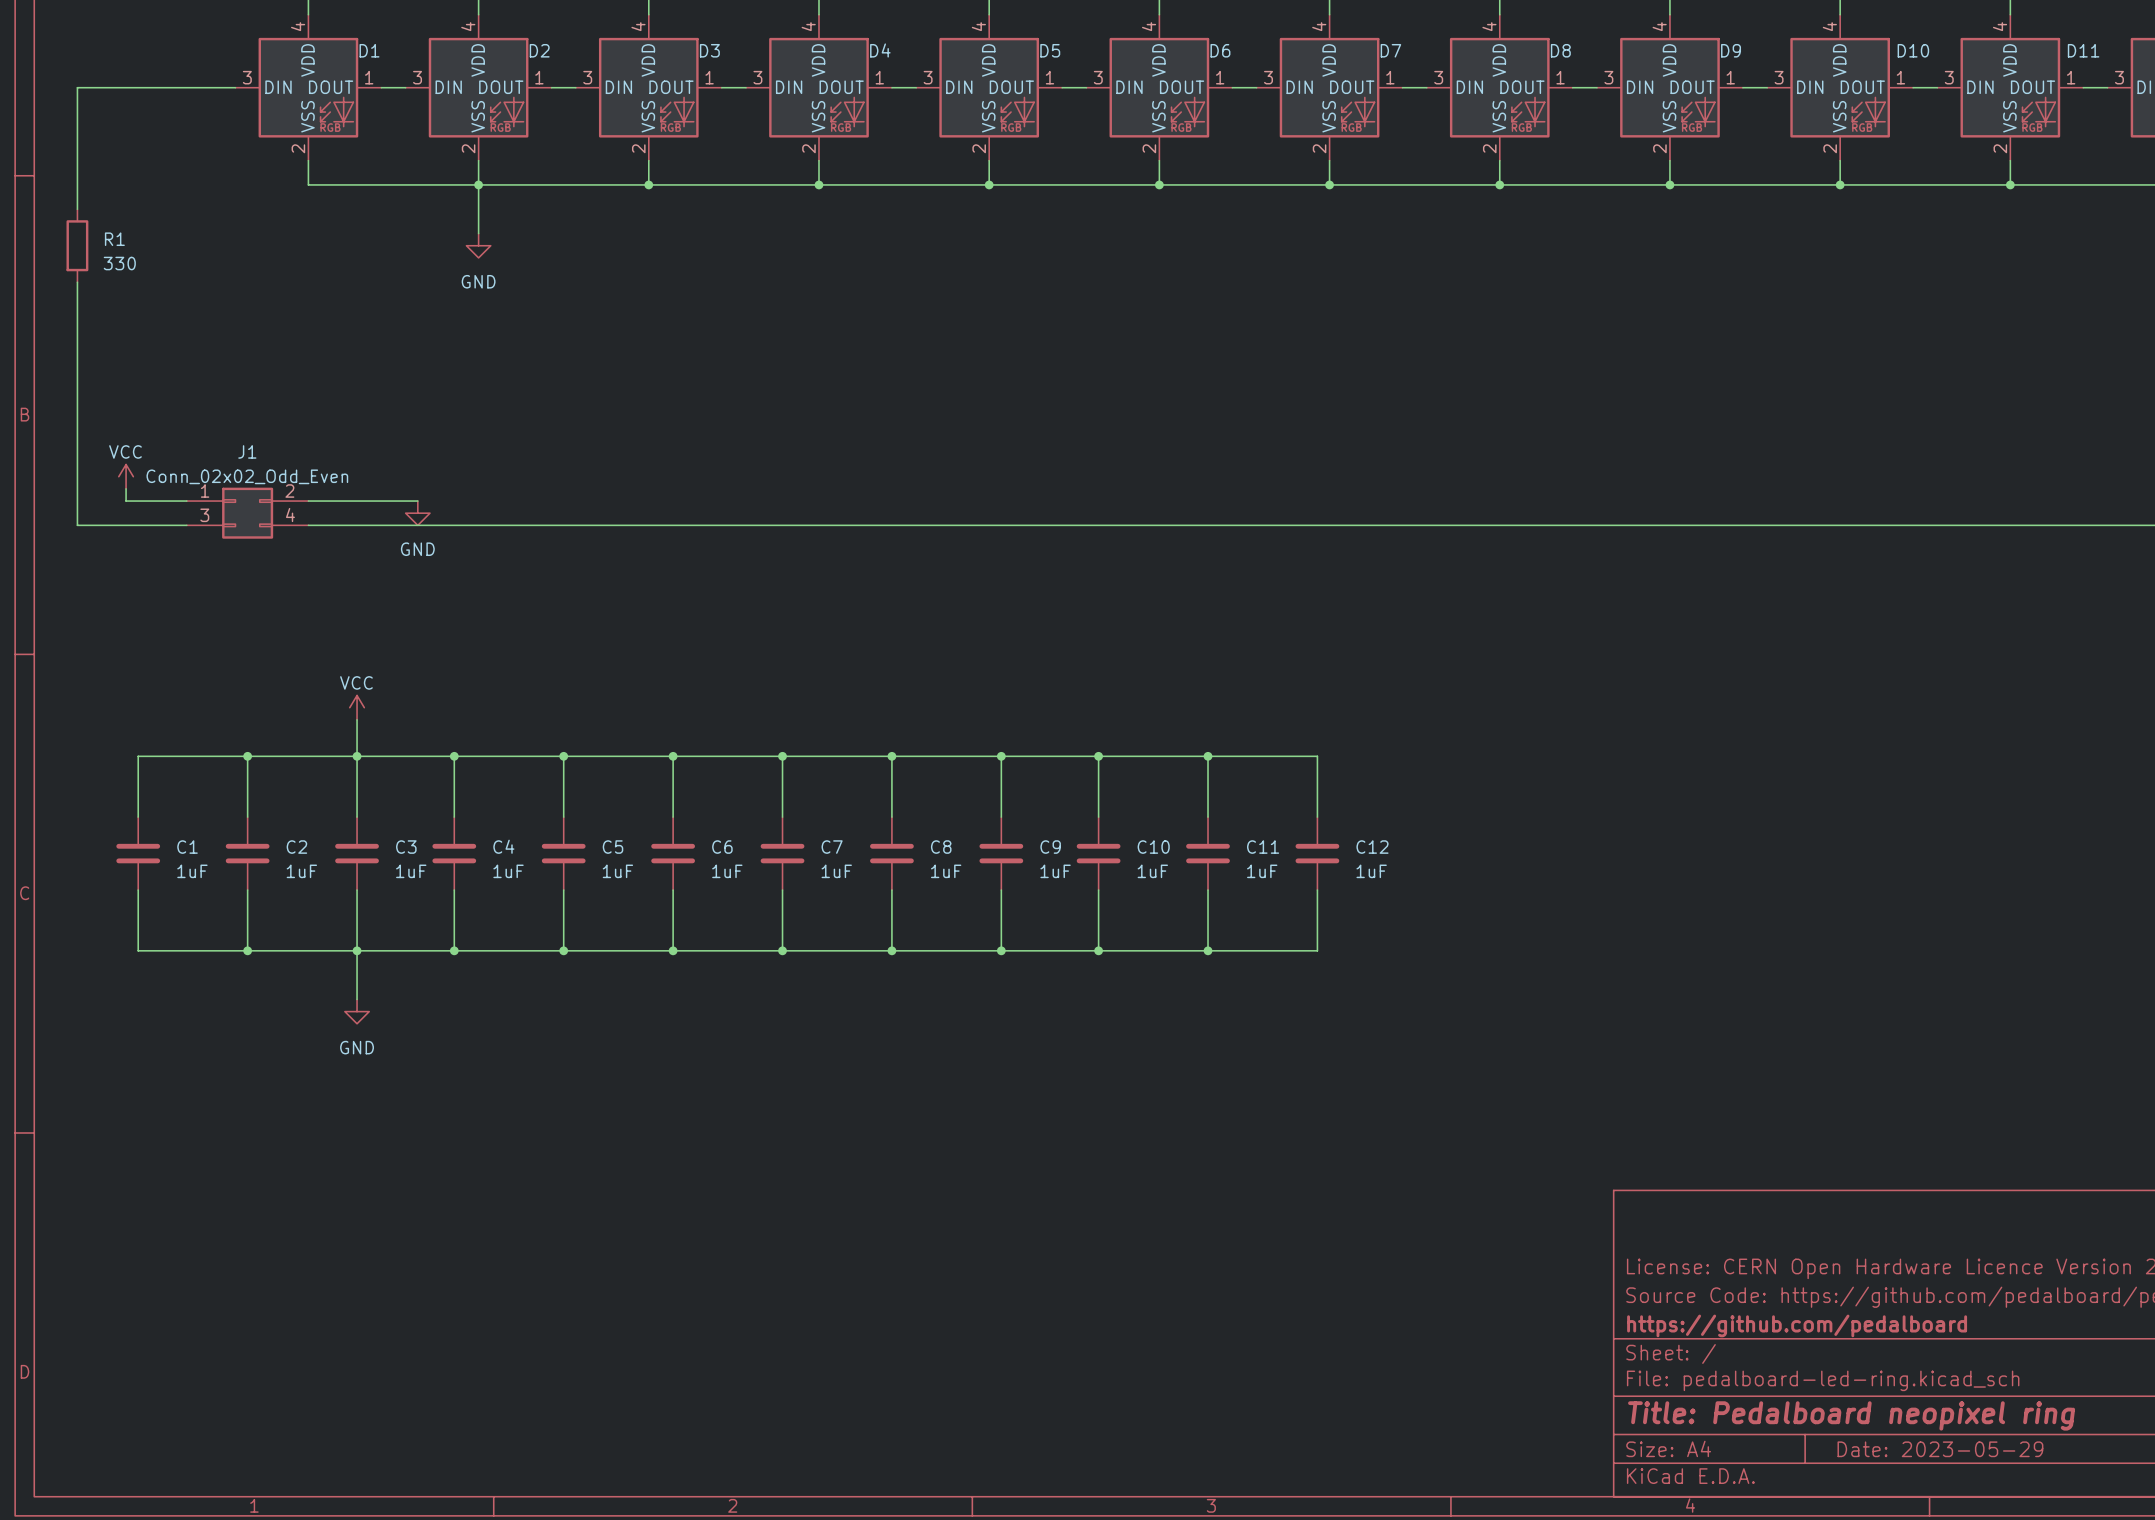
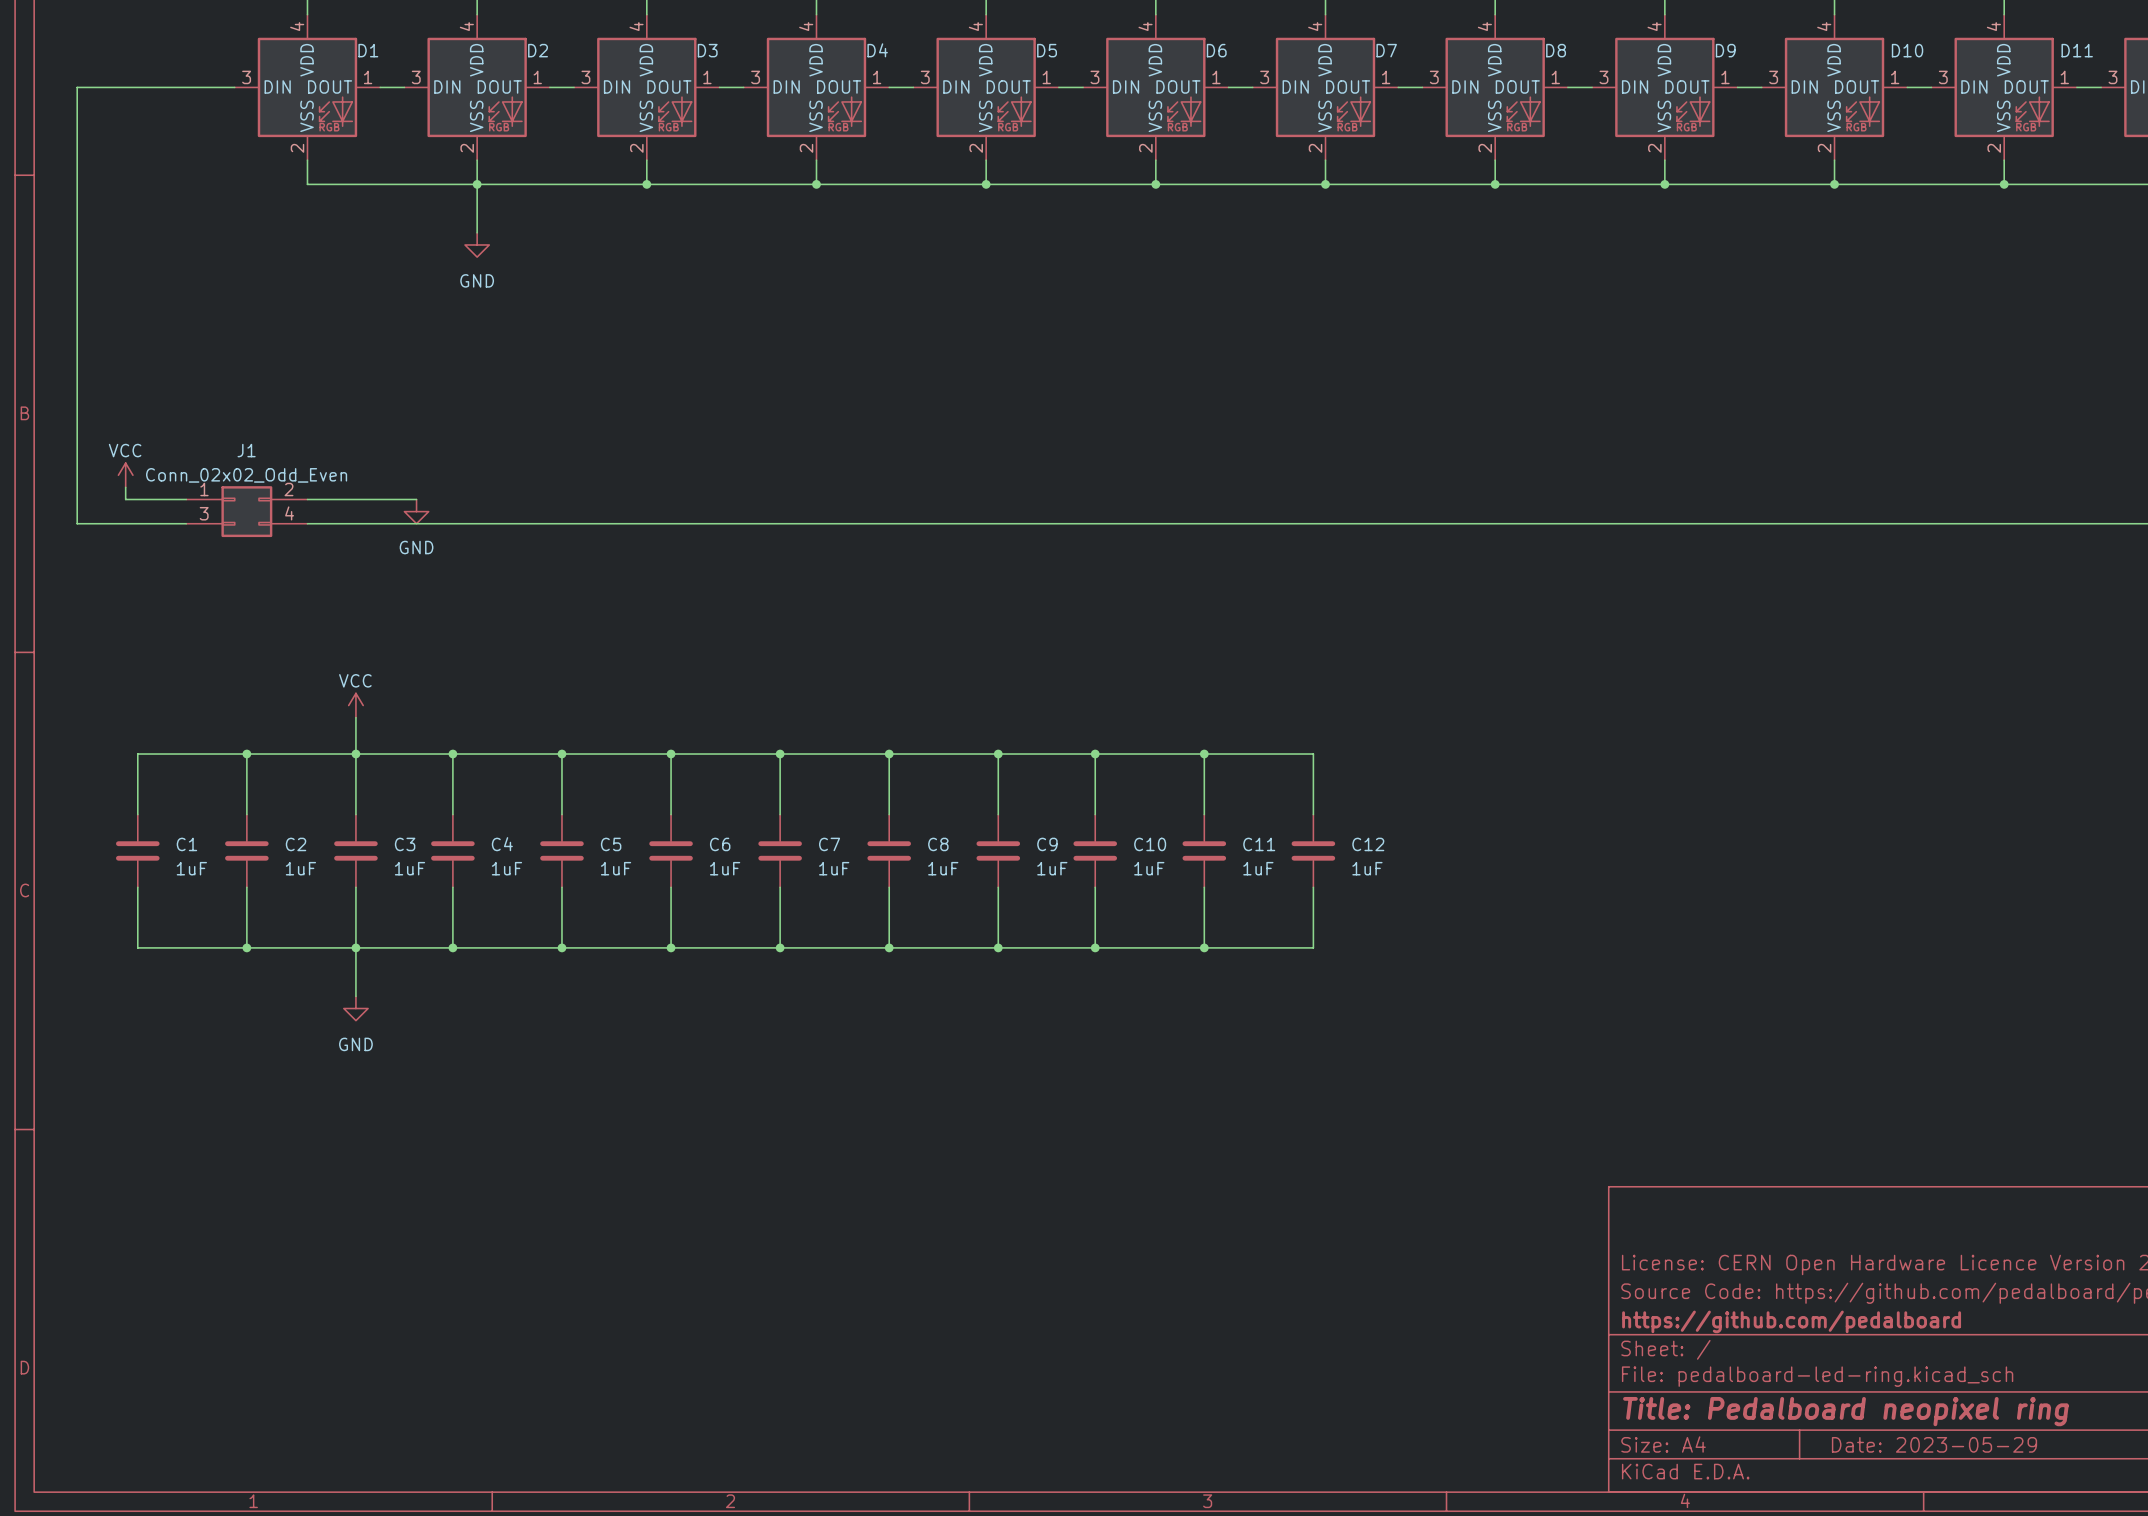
wire: none -> (77, 208) (77, 281)
R1: 330 (77, 245) -> none

